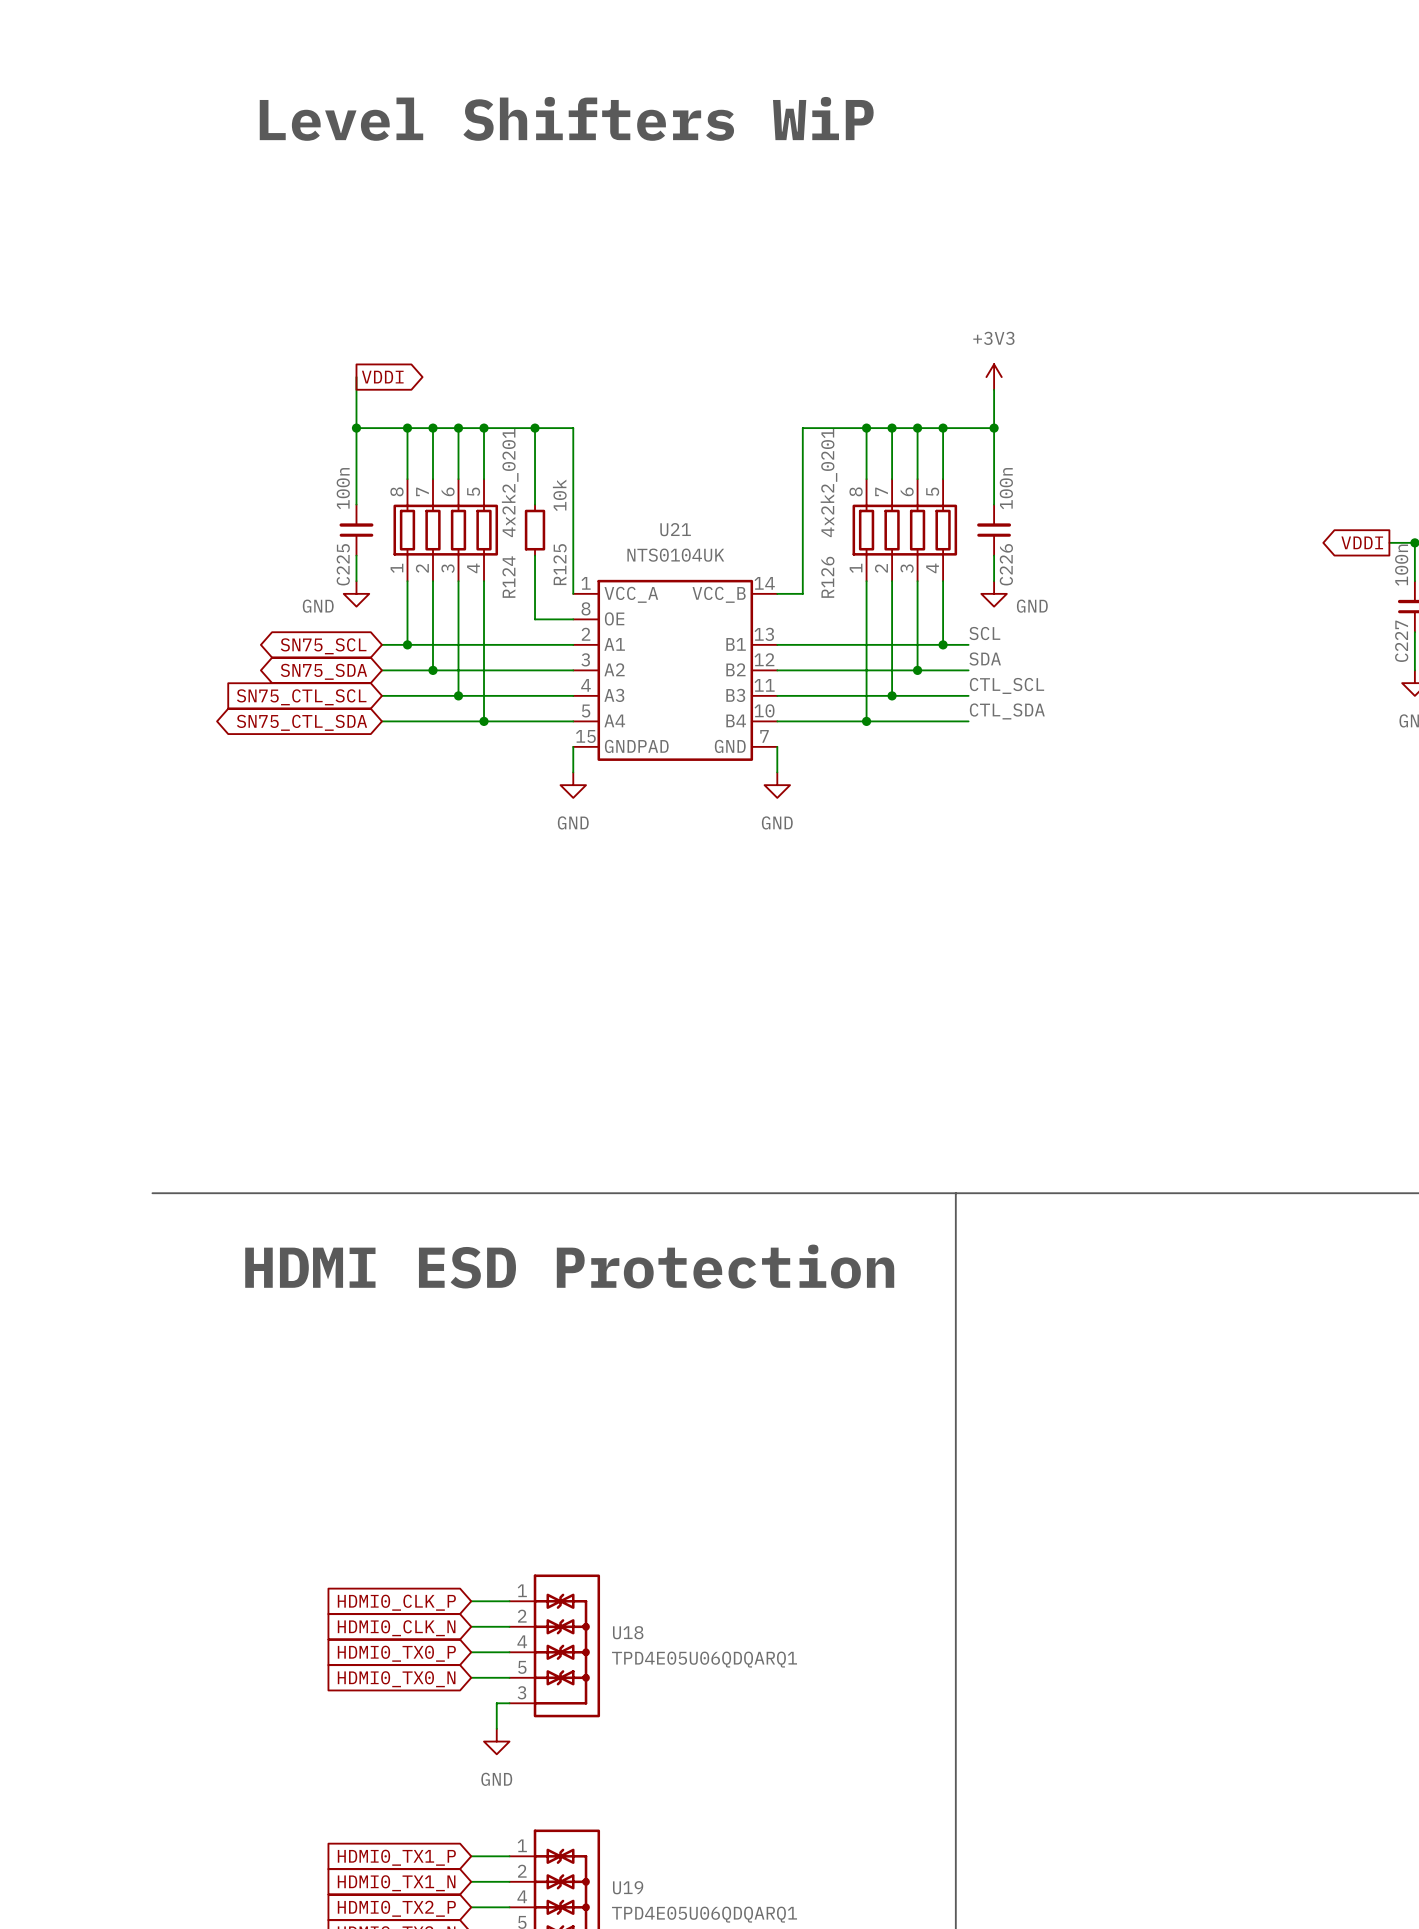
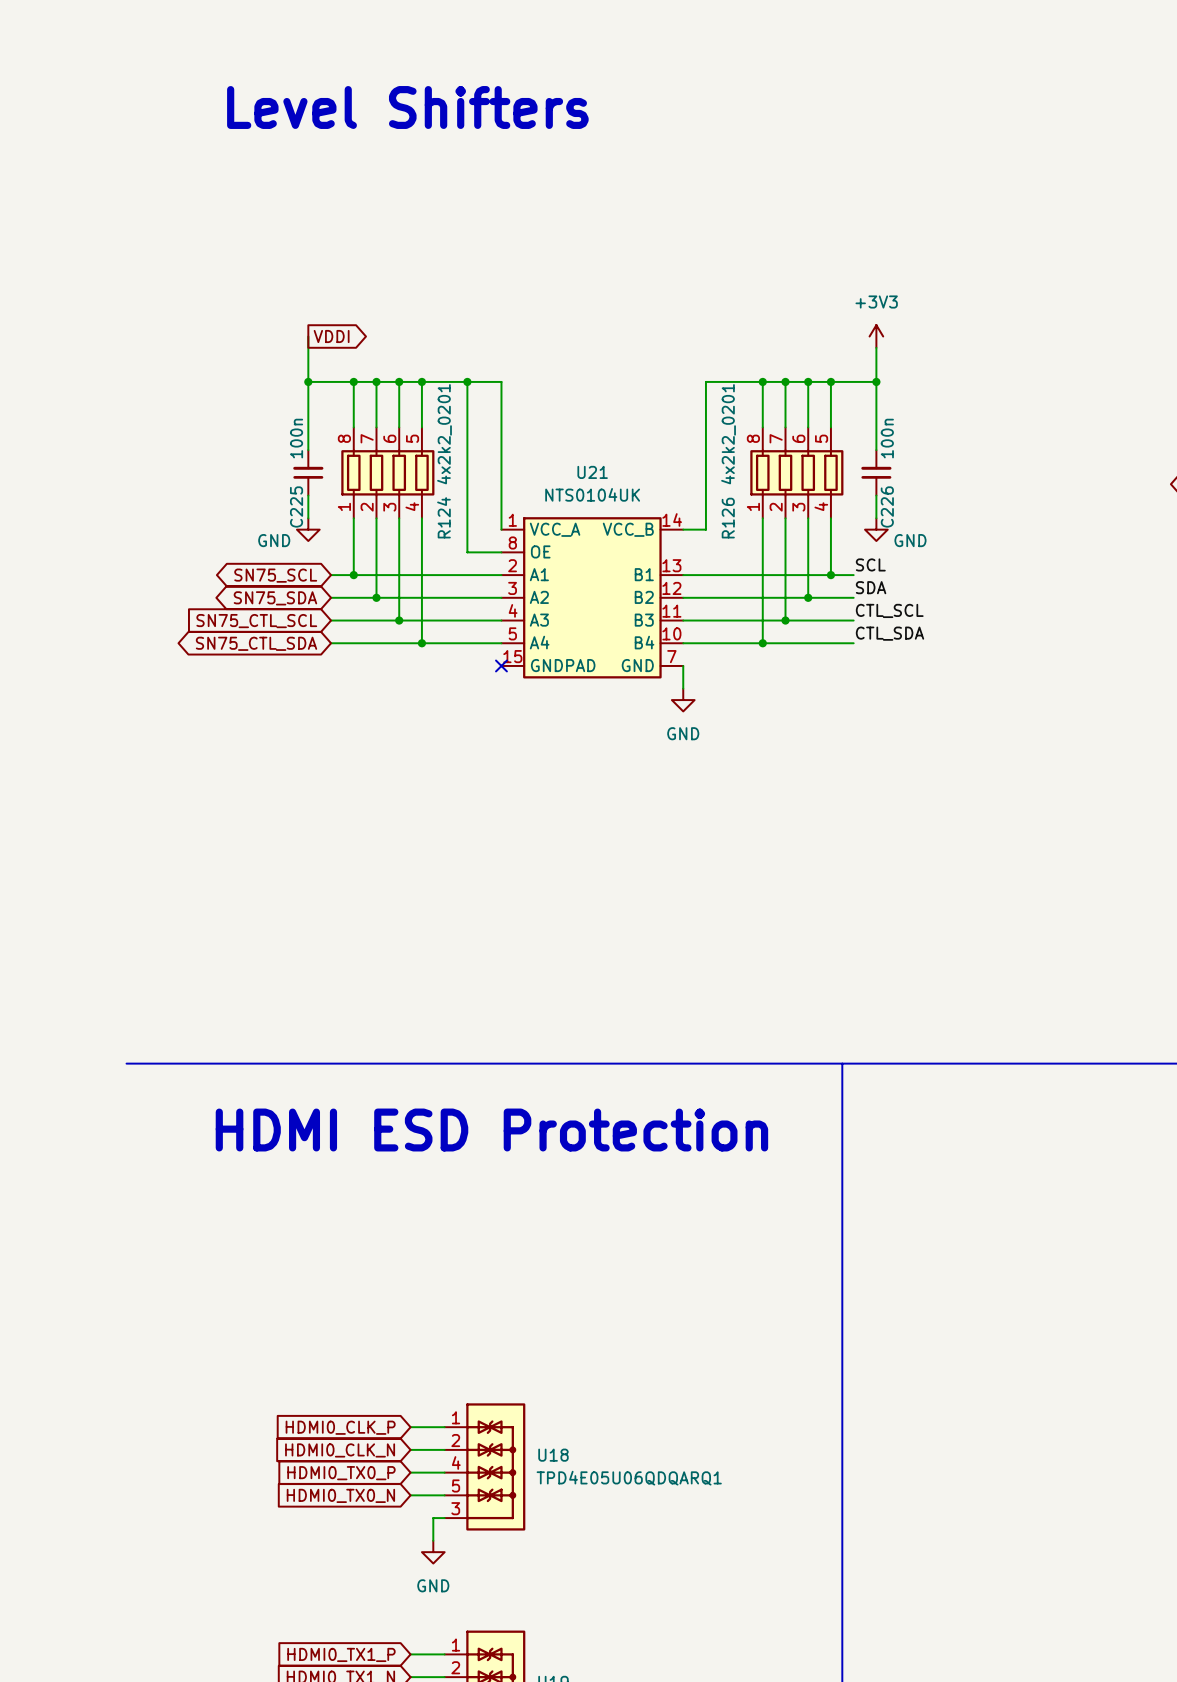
text: Level Shifters WiP (566, 118) -> Level Shifters (407, 107)
wire: none -> (467, 450) (467, 495)
R125: (535, 530) -> none
wire: (573, 746) (573, 772) -> none
no-connect mark: none -> (501, 665)
power symbol: GND (573, 785) -> none

